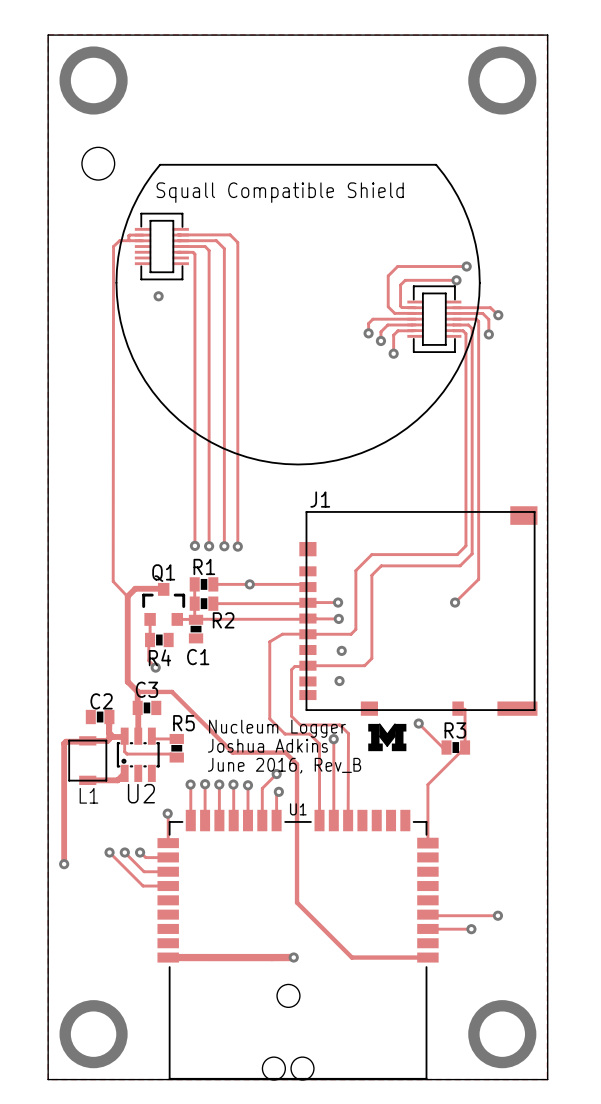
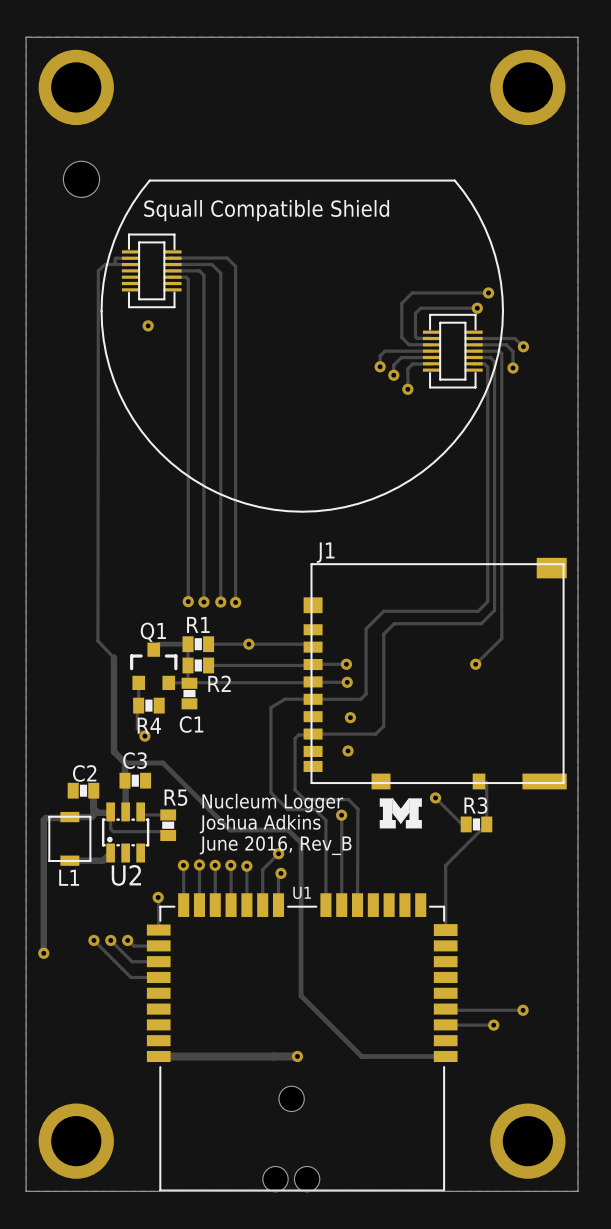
track: (163, 589) (135, 588) (127, 596) -> (153, 649) (159, 644) (188, 644)

